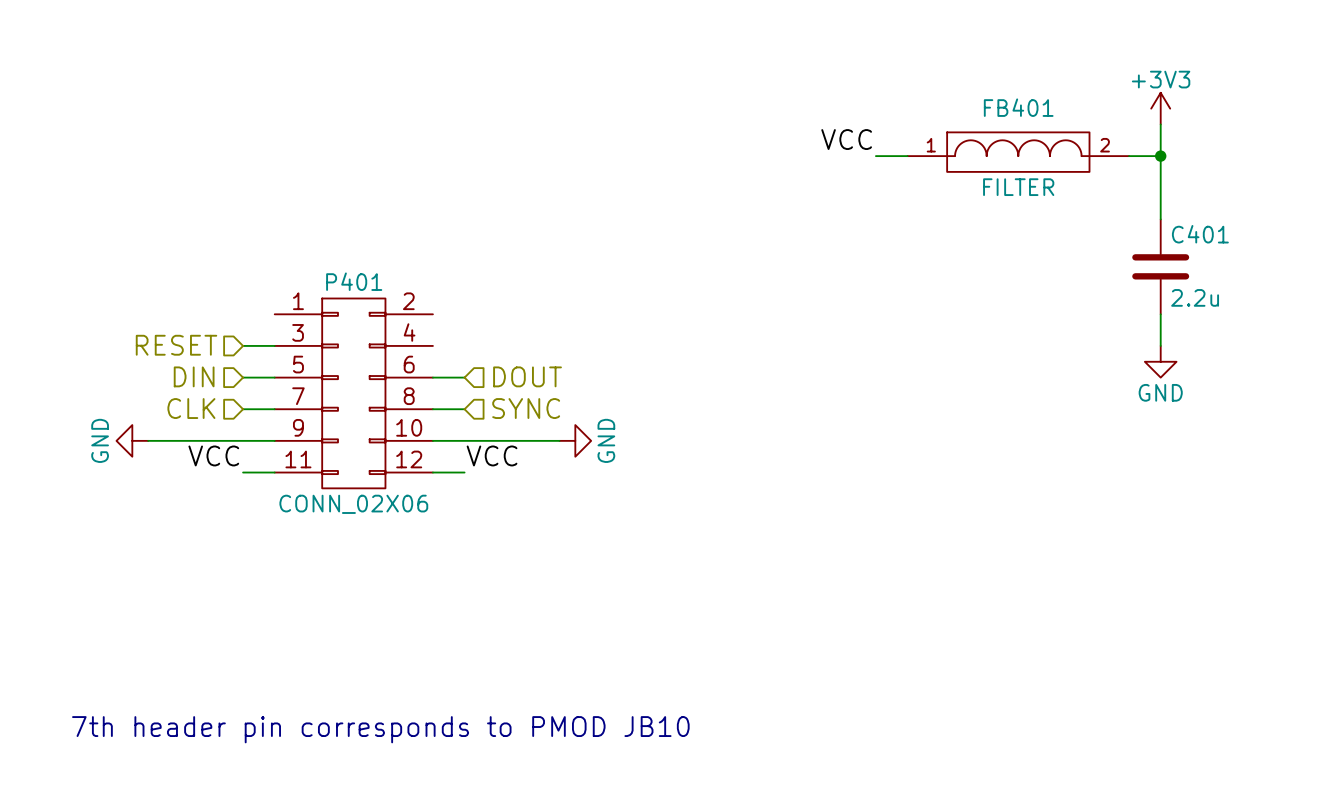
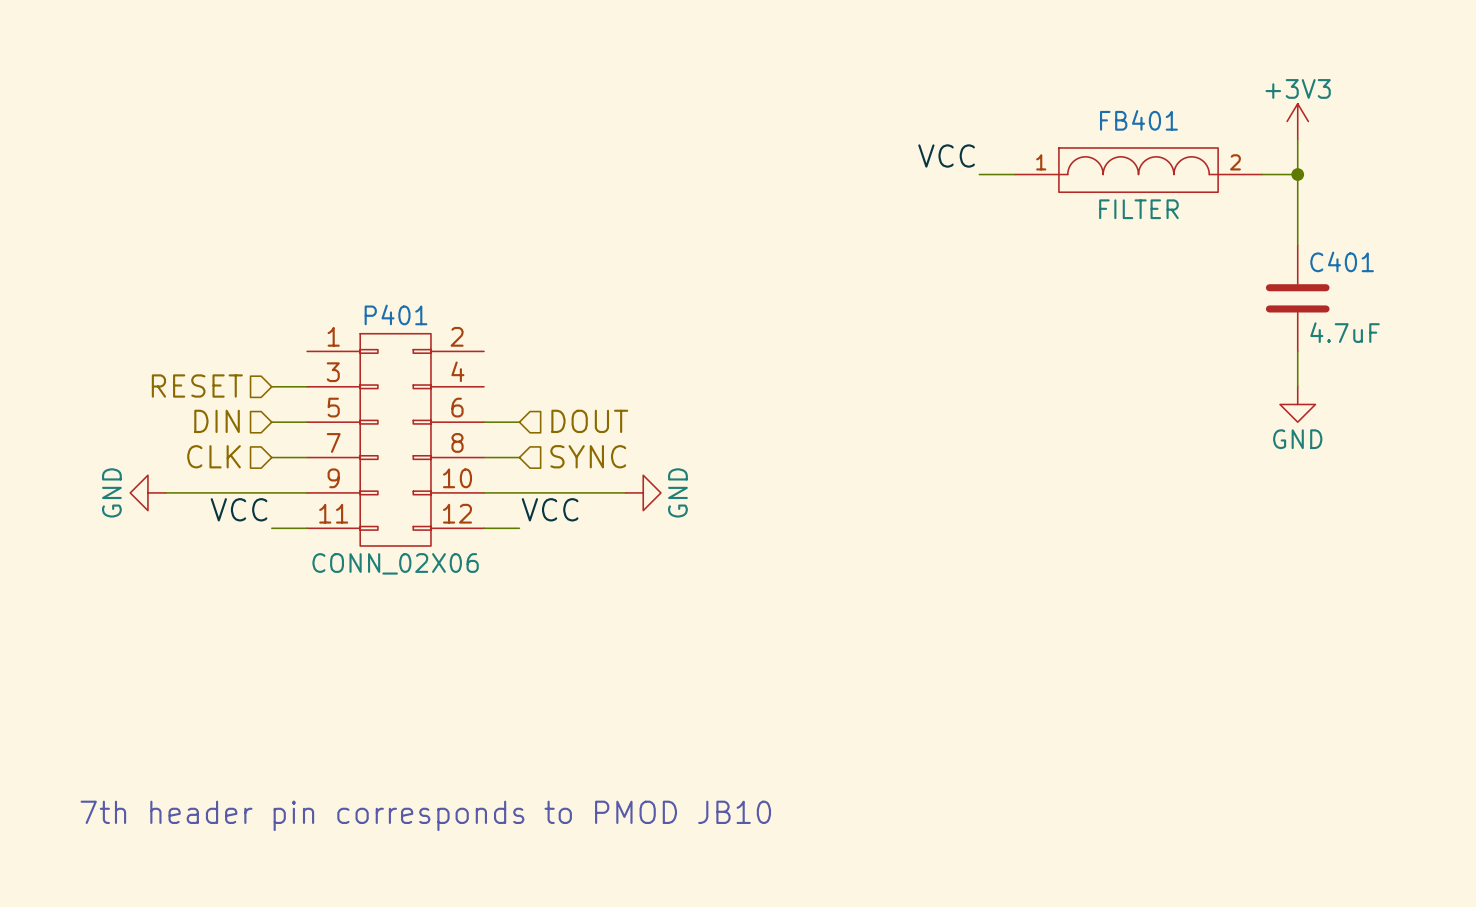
C401 value: 2.2u (1195, 297) -> 4.7uF (1345, 332)

